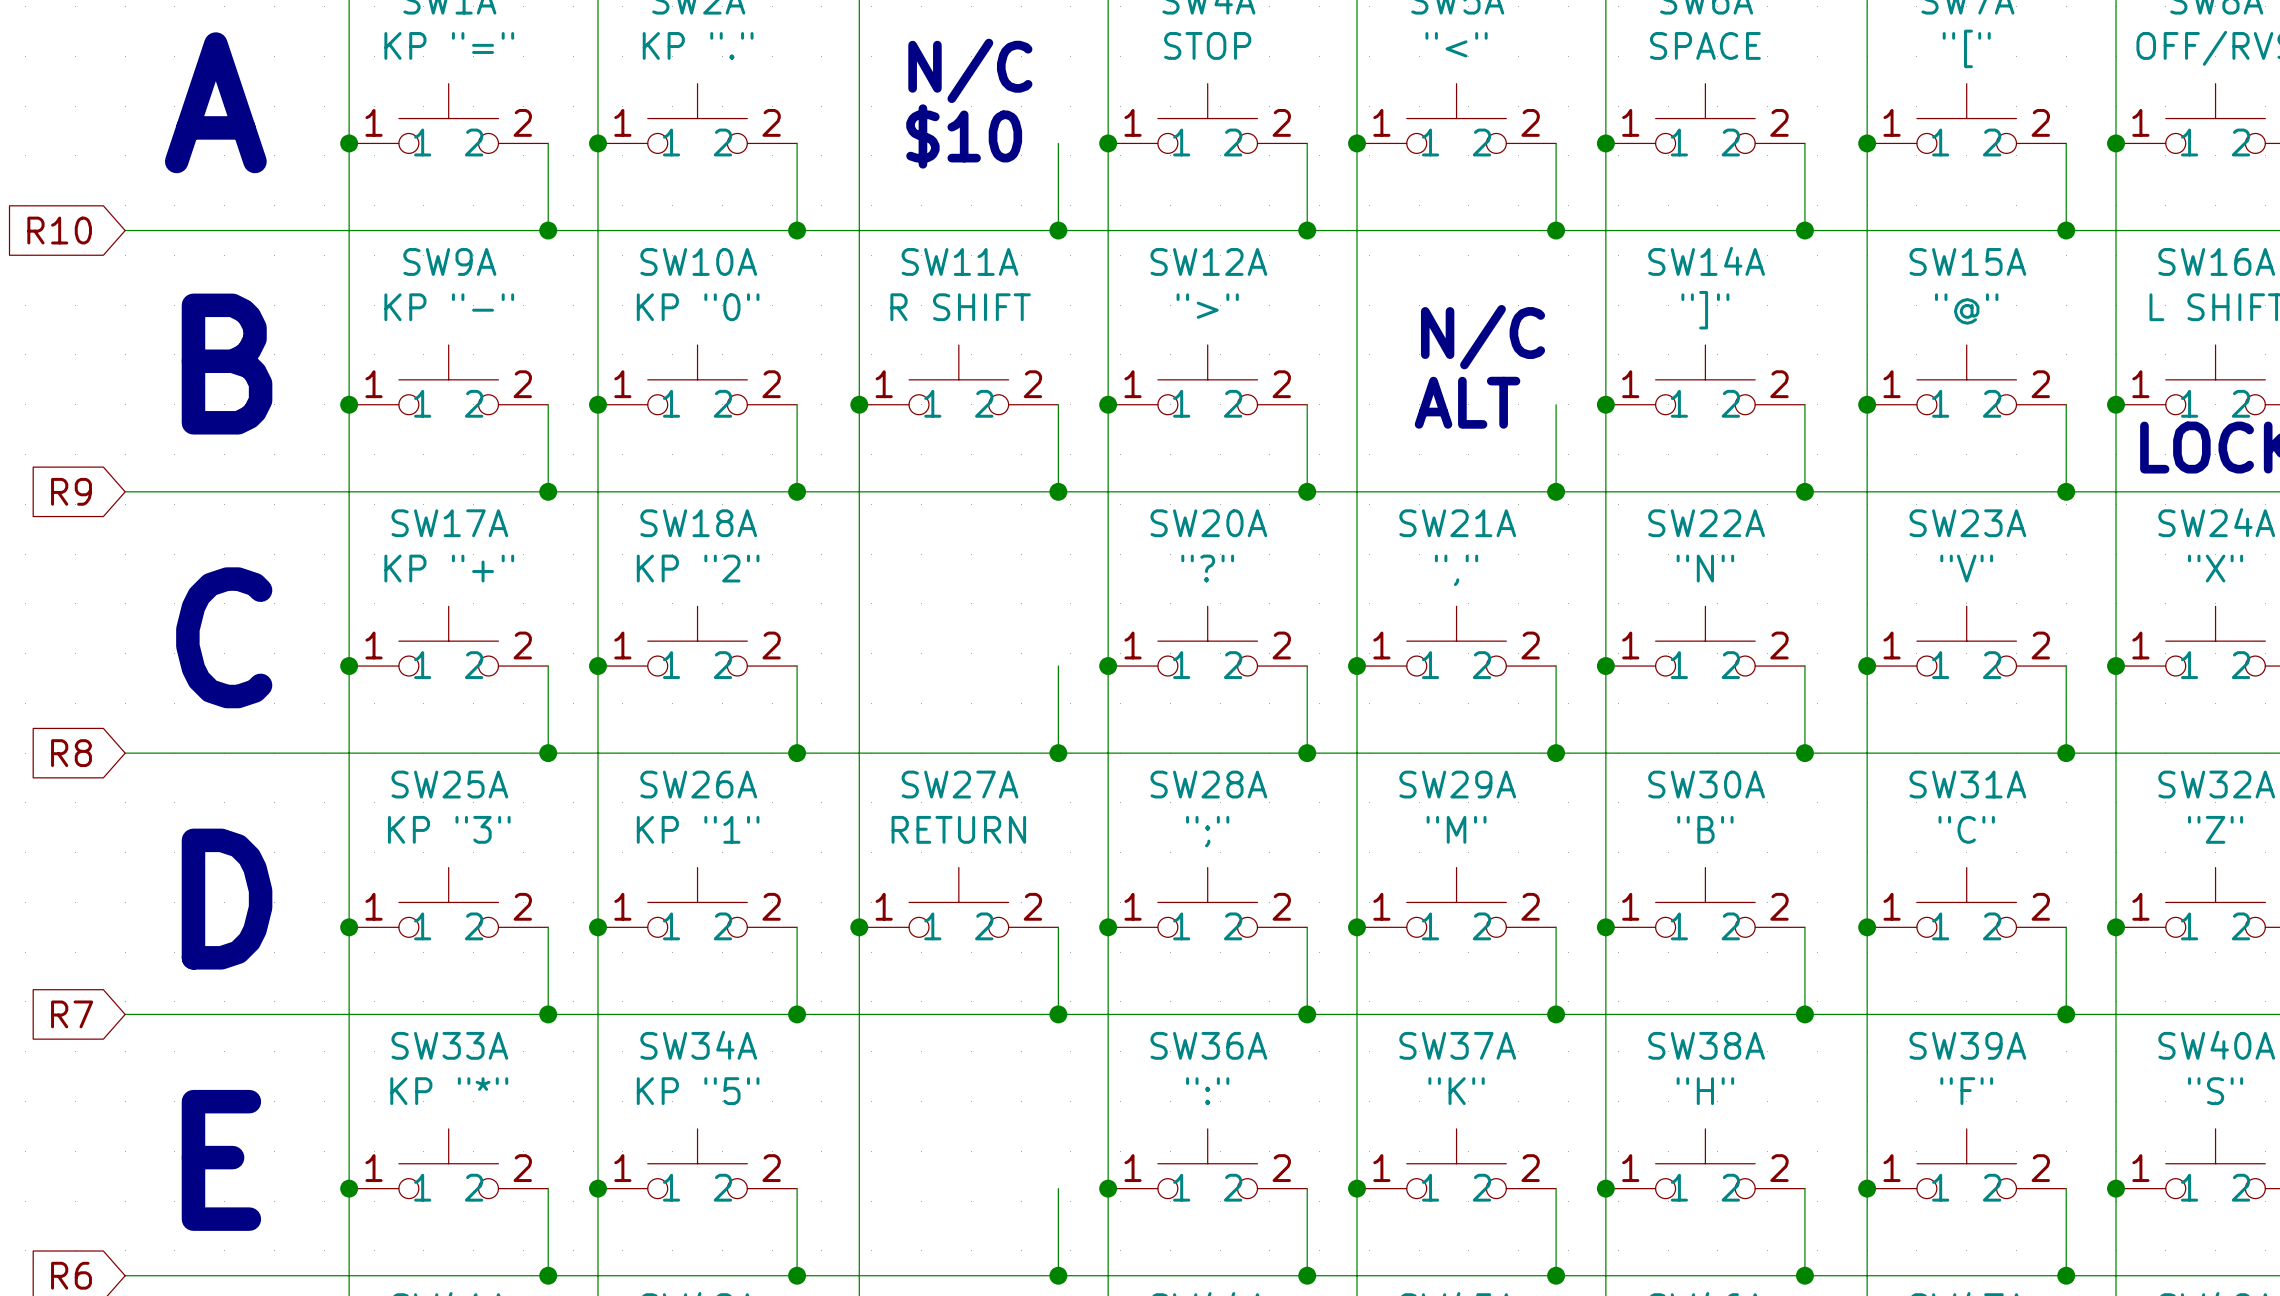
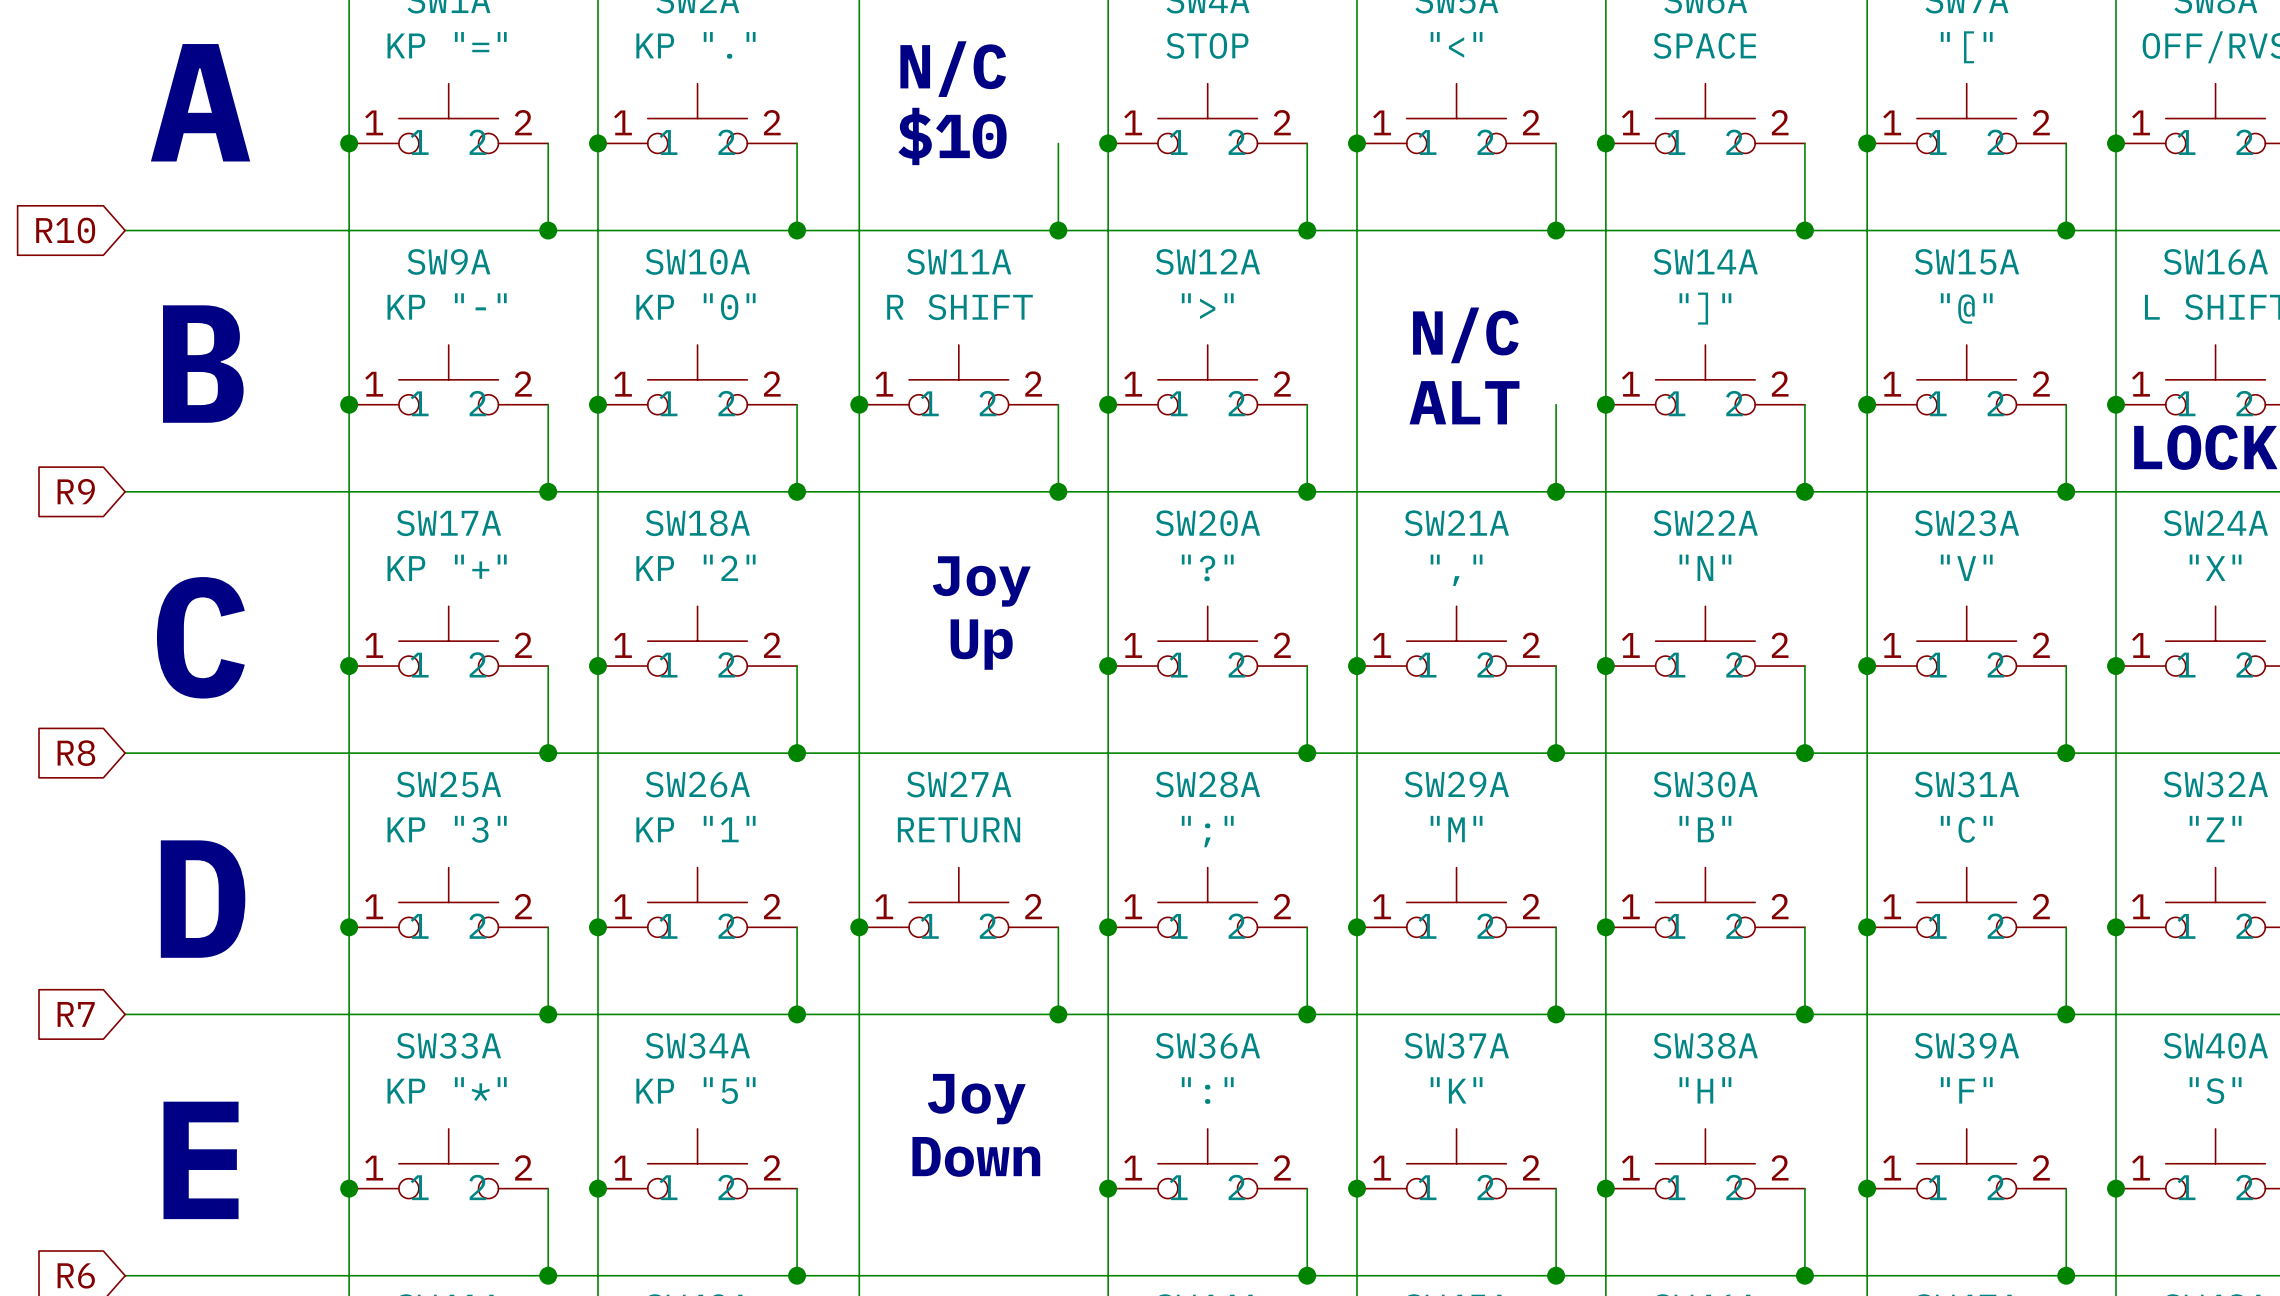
text: none -> Joy (981, 581)
text: none -> Up (981, 644)
wire: (1058, 666) (1058, 753) -> none
junction: (1058, 753) -> none
text: none -> Joy (976, 1099)
text: none -> Down (976, 1156)
wire: (1058, 1188) (1058, 1275) -> none
junction: (1058, 1275) -> none

